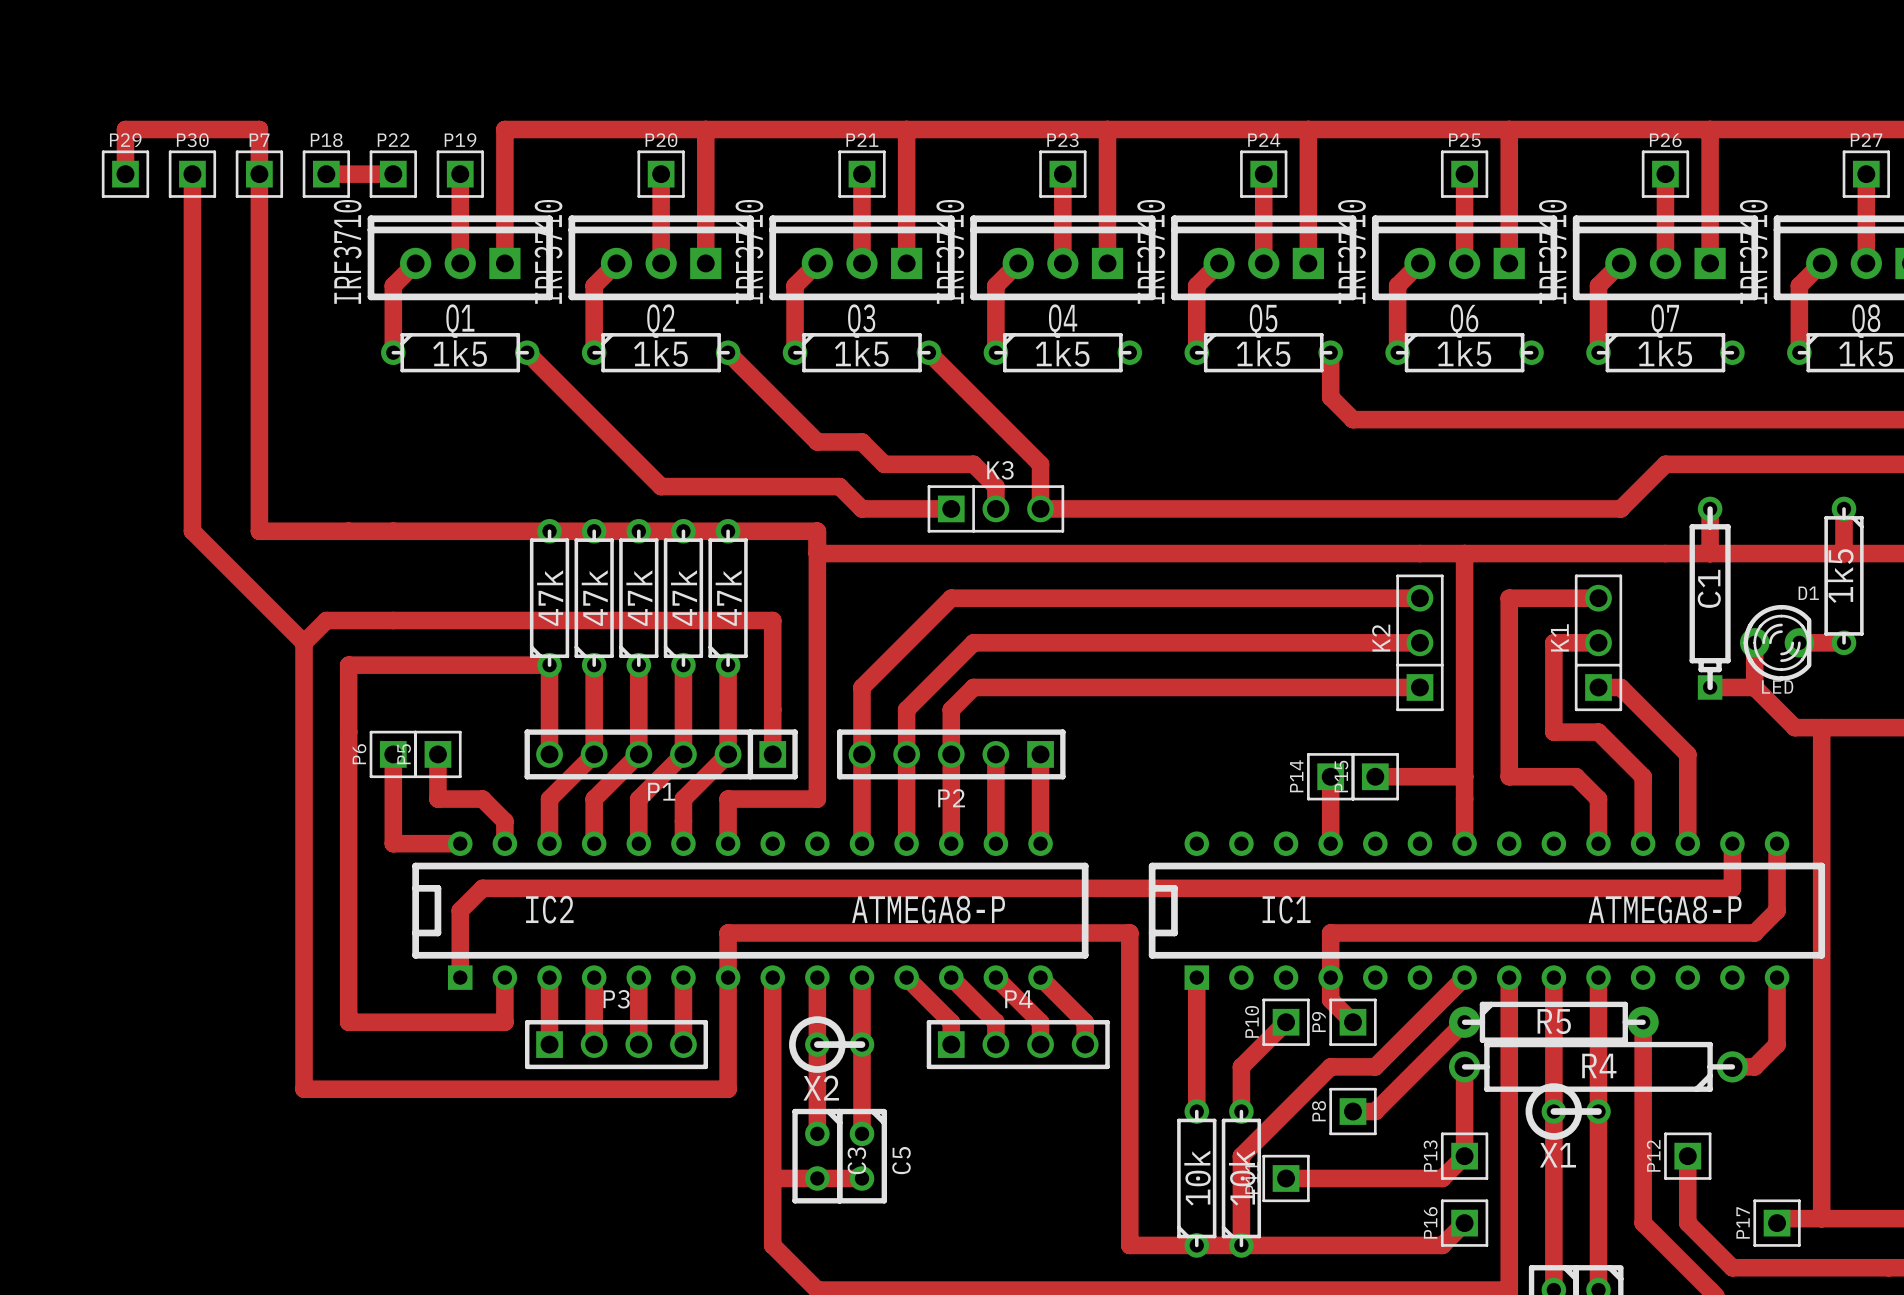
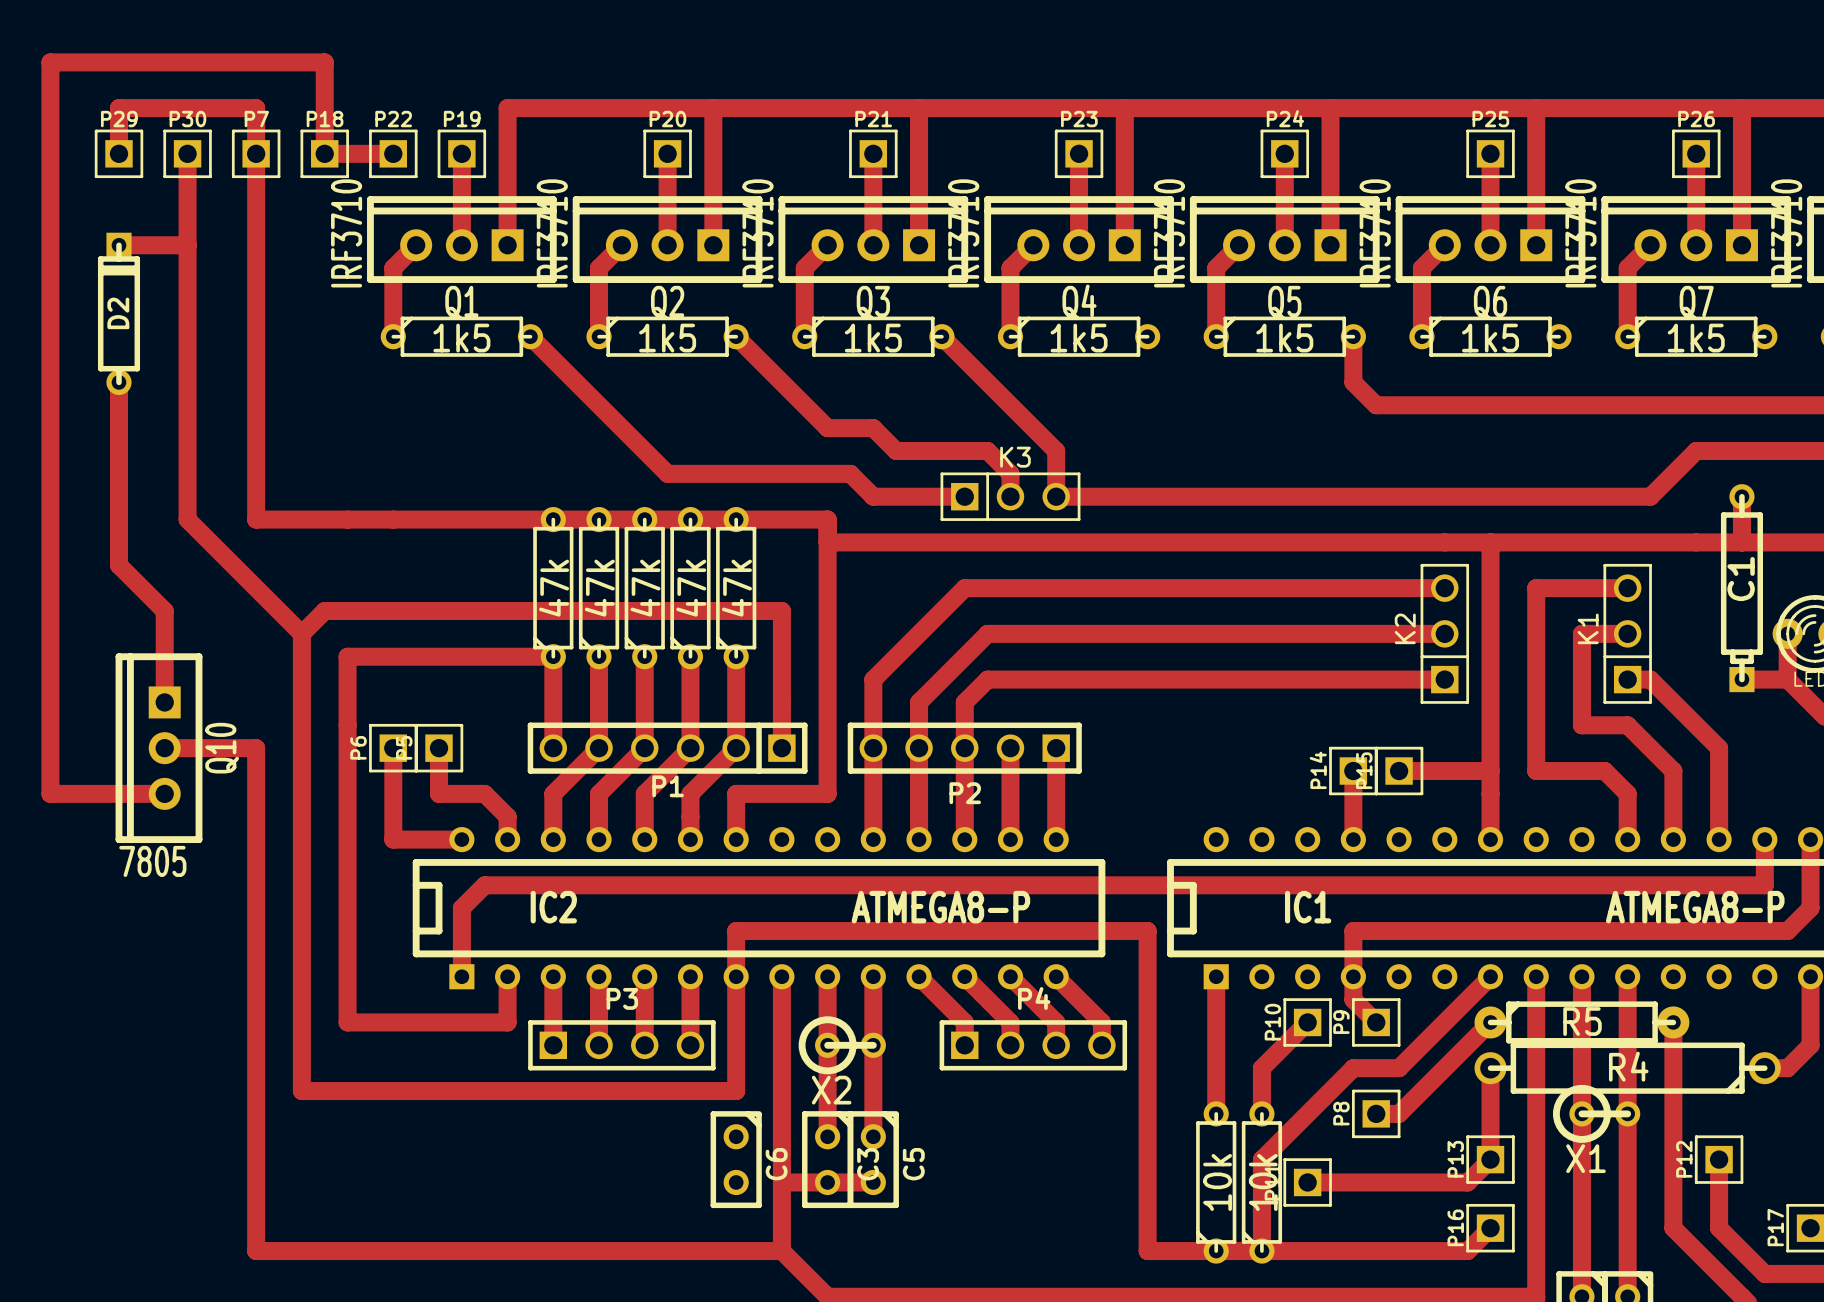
track: none -> (324, 153) (324, 62) (50, 62) (50, 793) (164, 793)
track: none -> (119, 245) (187, 245)
D2: none -> (119, 313)
track: none -> (119, 382) (119, 565) (164, 611) (164, 702)
Q10: none -> 7805 (159, 748)
track: none -> (164, 748) (256, 748) (256, 1251) (781, 1251)
C6: none -> (736, 1159)

